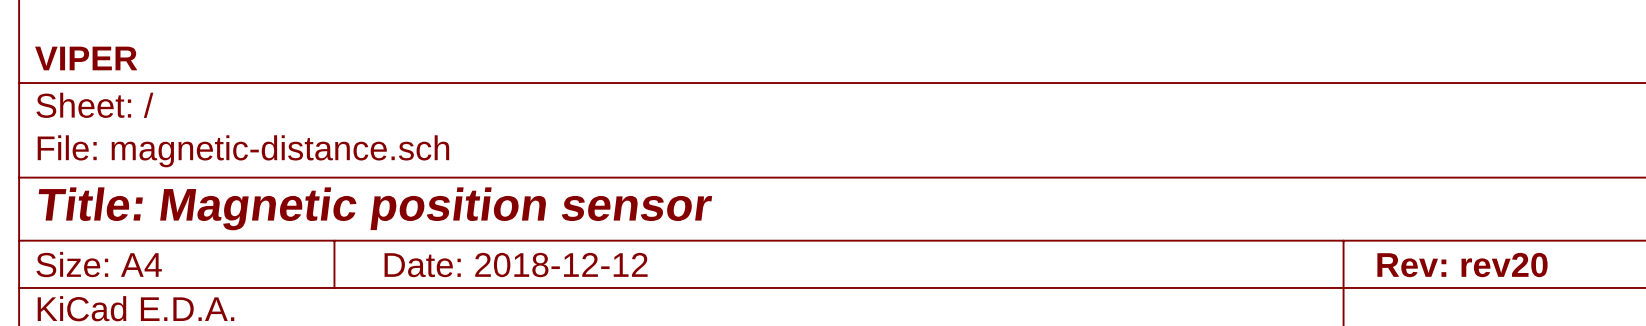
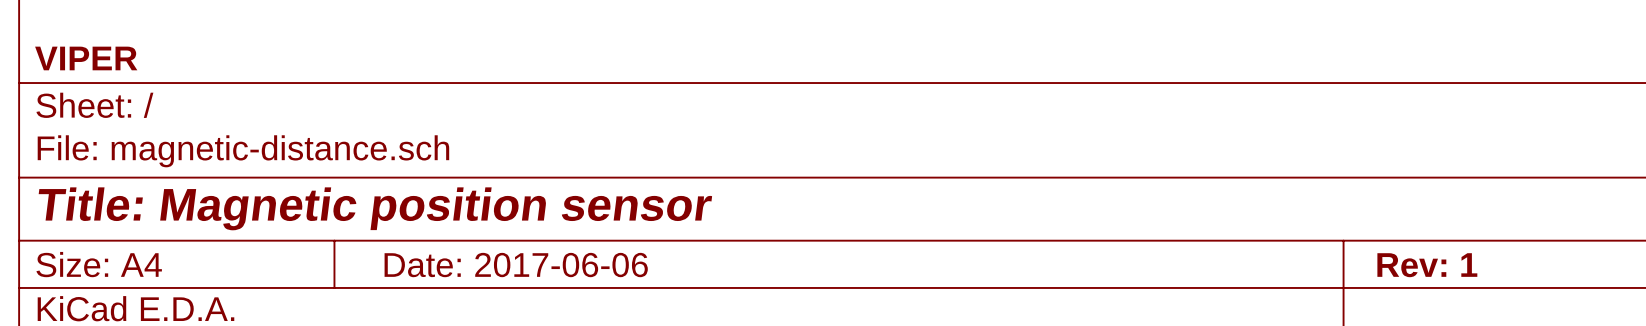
title block: Date: 2018-12-12 (516, 265) -> Date: 2017-06-06 (516, 265)
title block: Rev: rev20 (1462, 265) -> Rev: 1 (1427, 265)

